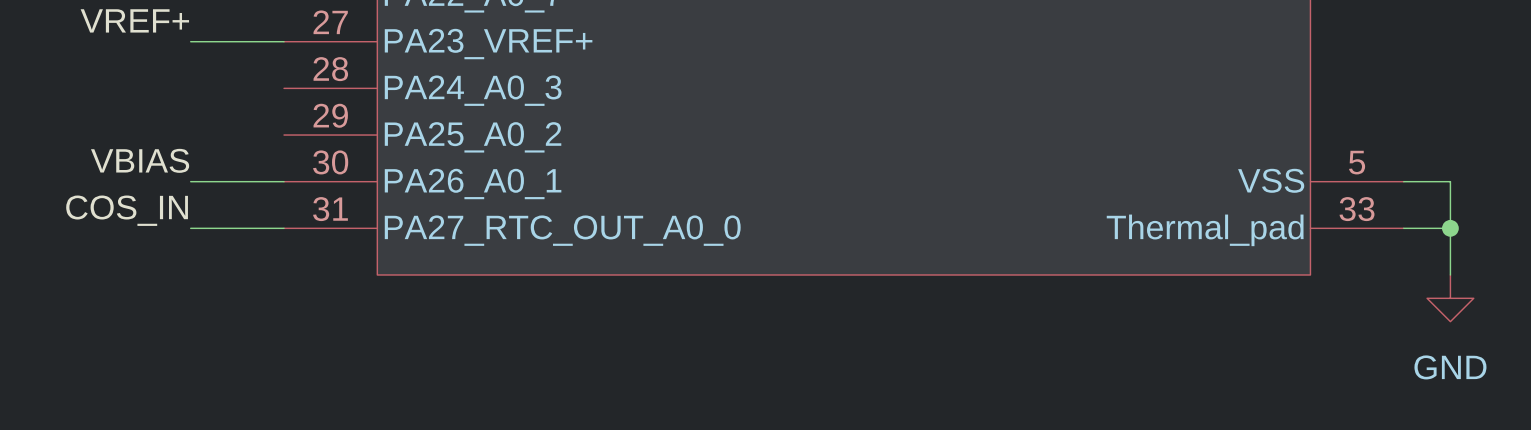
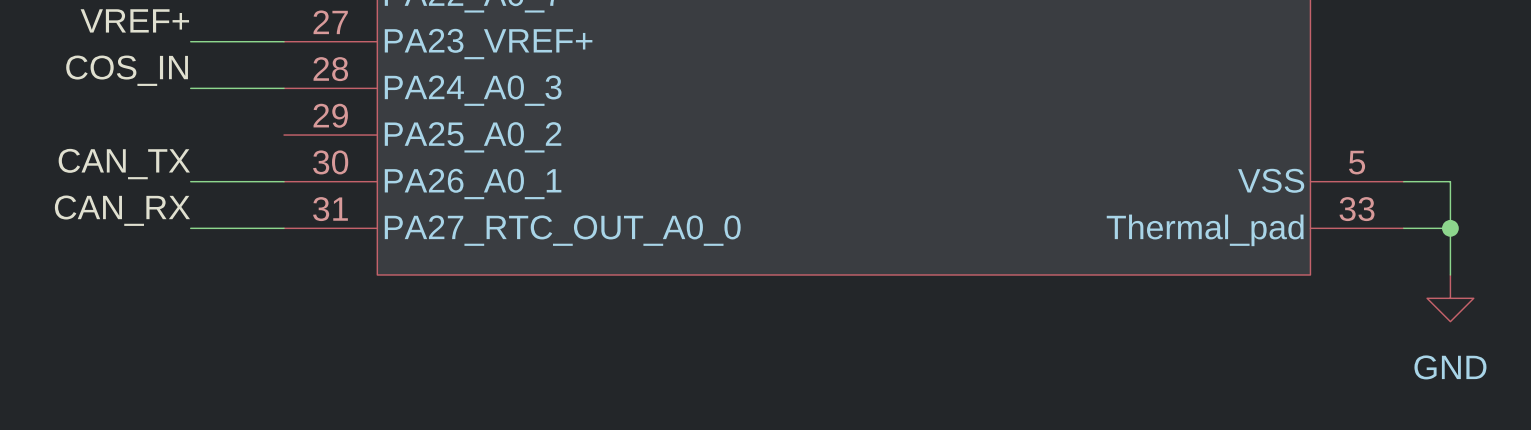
label: none -> COS_IN (127, 70)
wire: none -> (190, 88) (284, 88)
label: VBIAS (140, 160) -> CAN_TX (124, 164)
label: COS_IN (127, 210) -> CAN_RX (122, 210)

